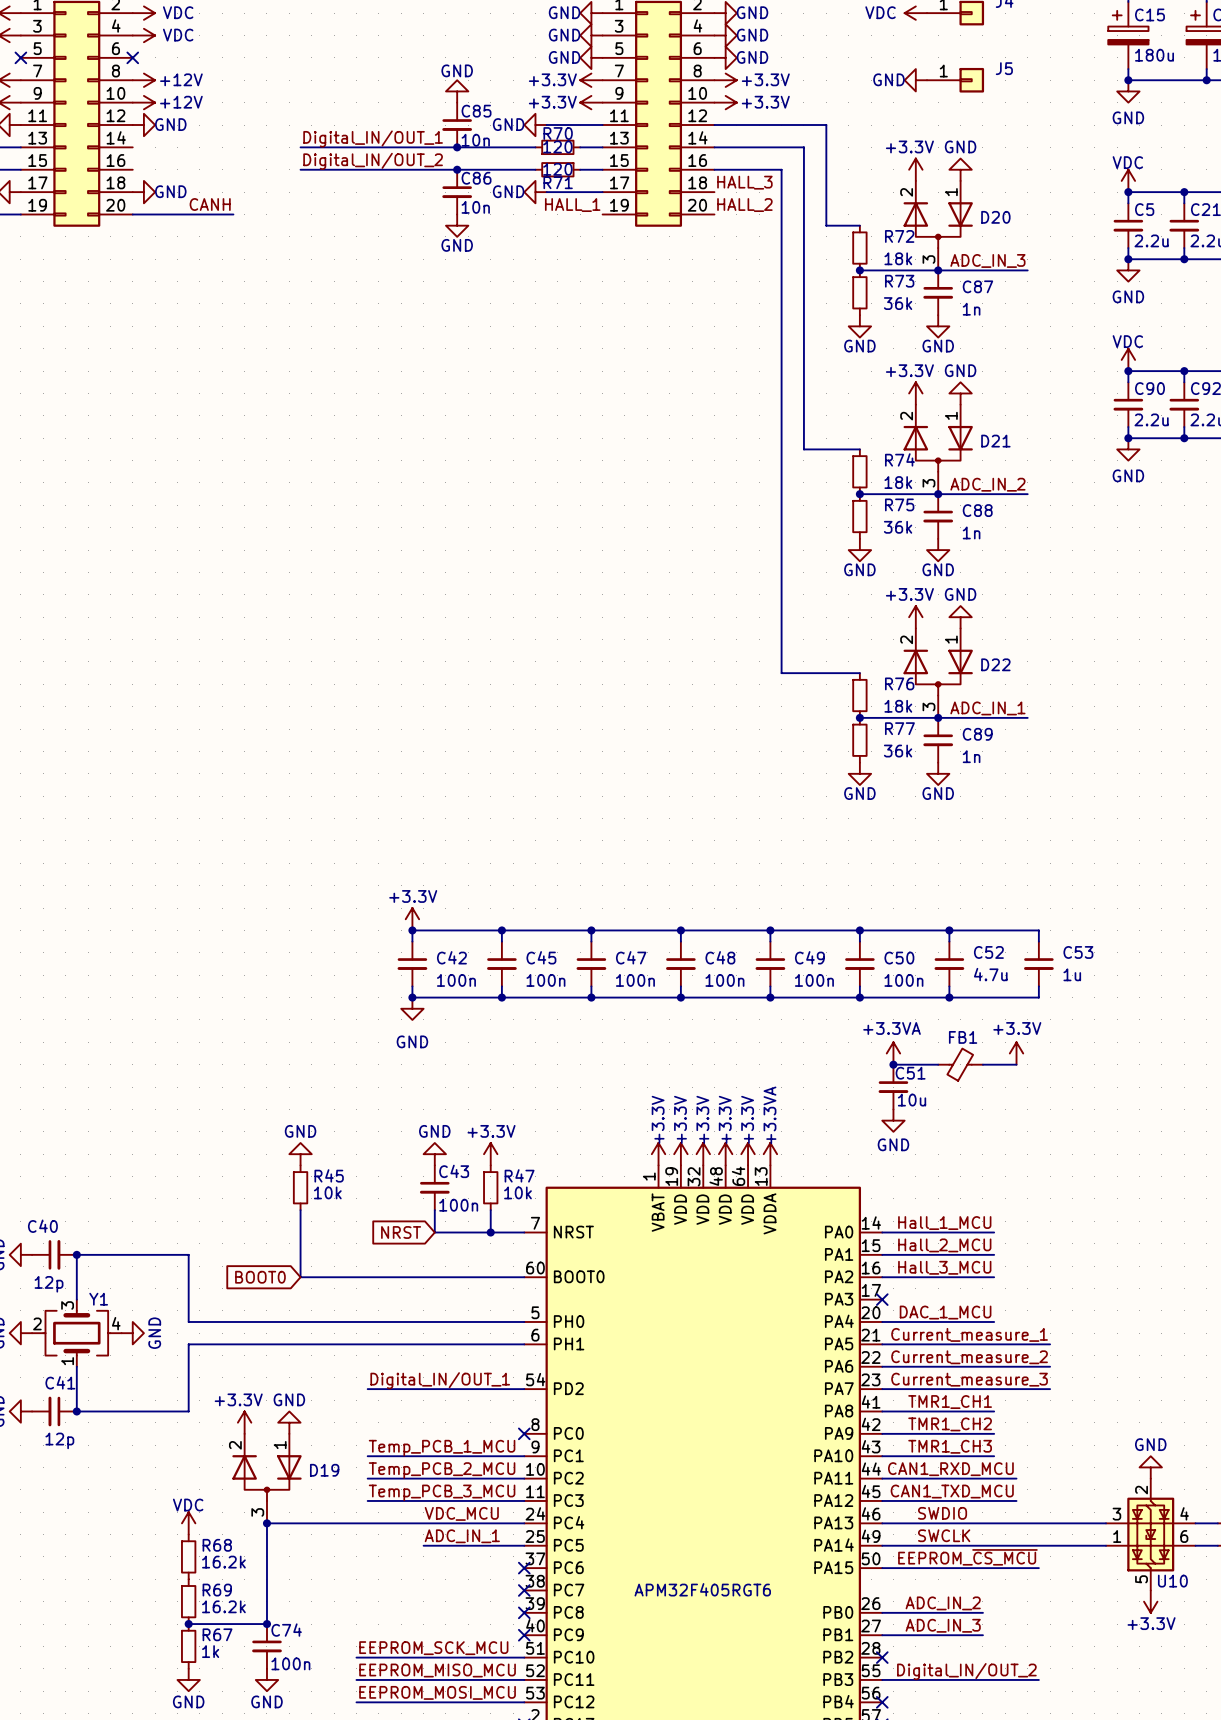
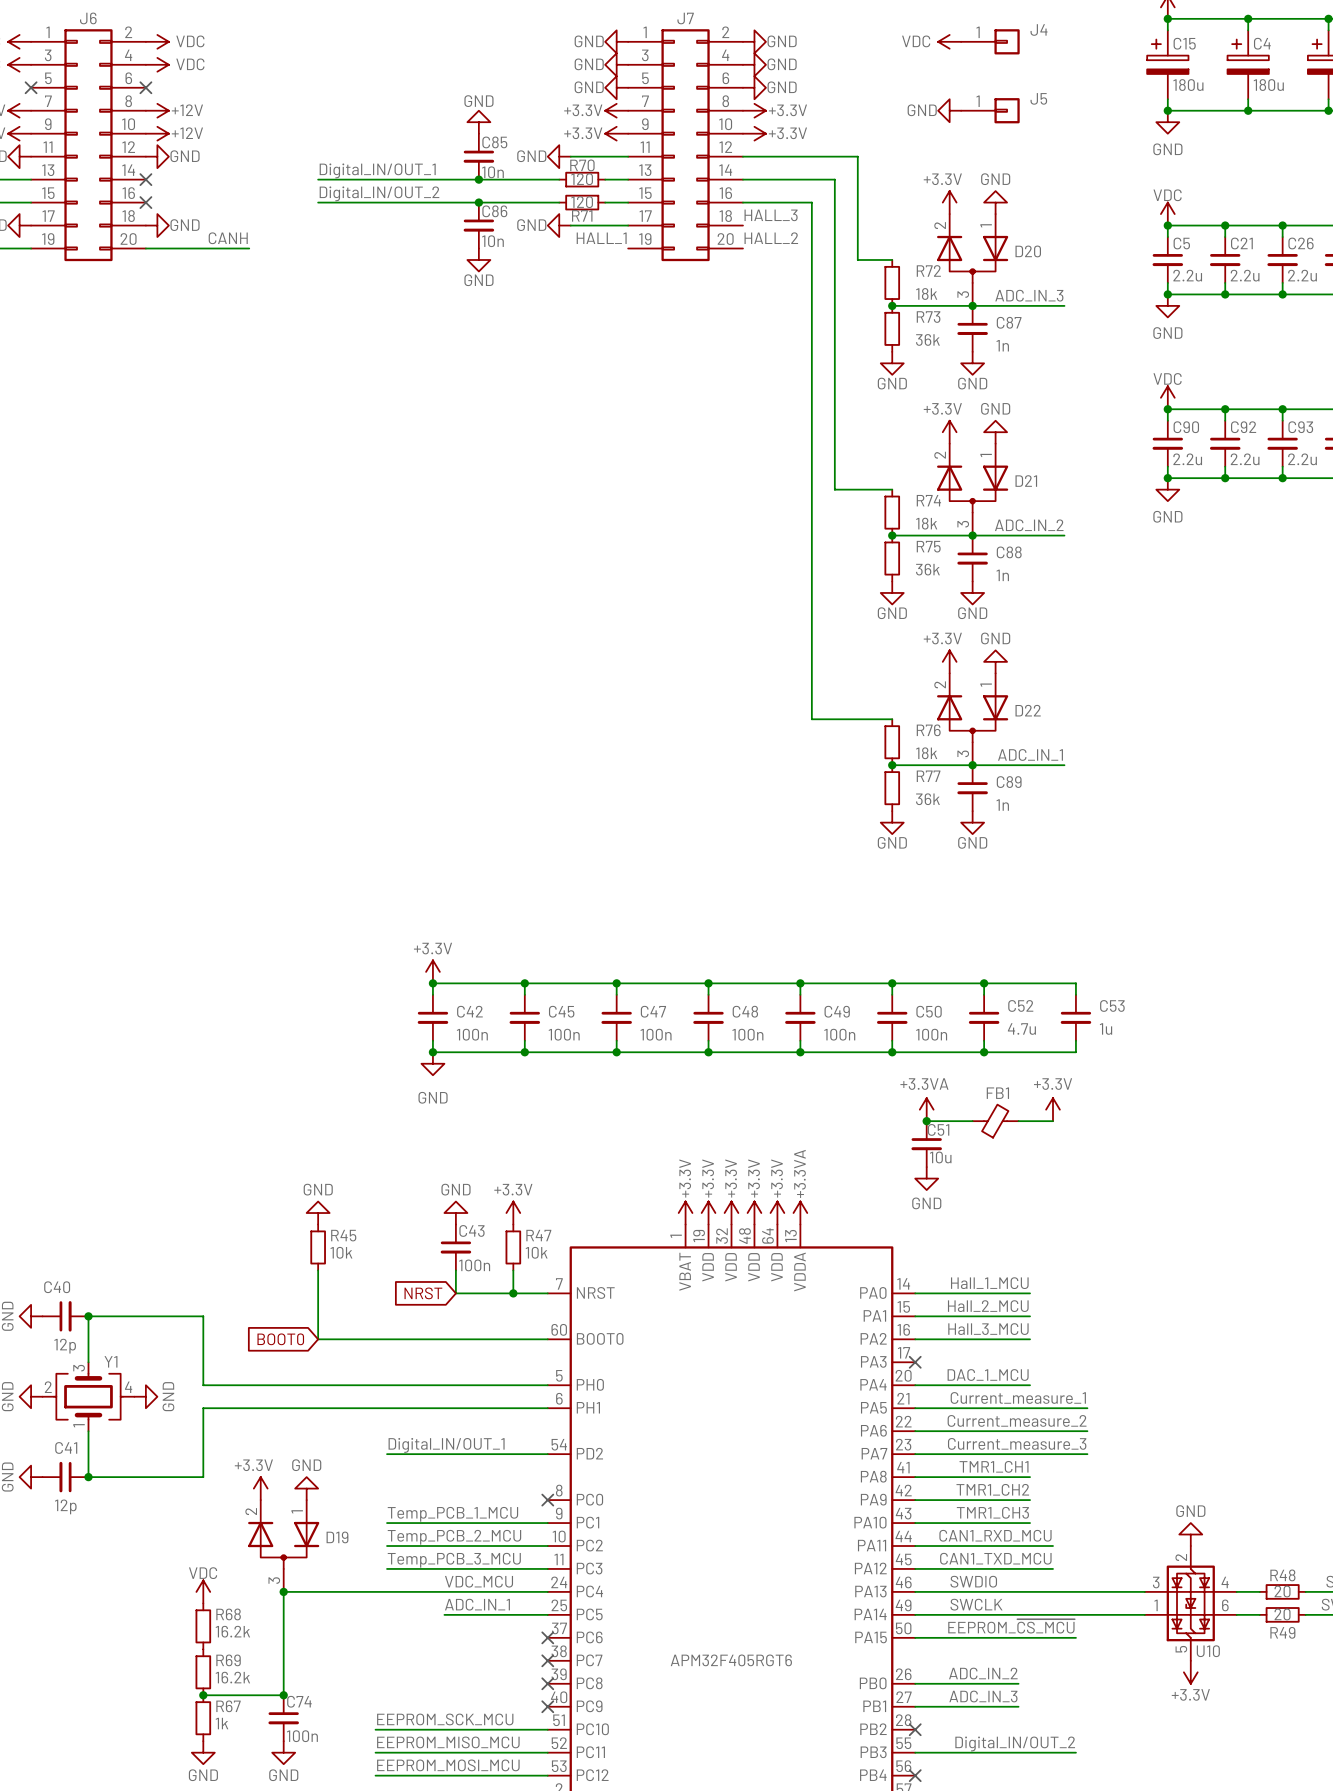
no-connect mark: none -> (145, 179)
no-connect mark: none -> (145, 202)

